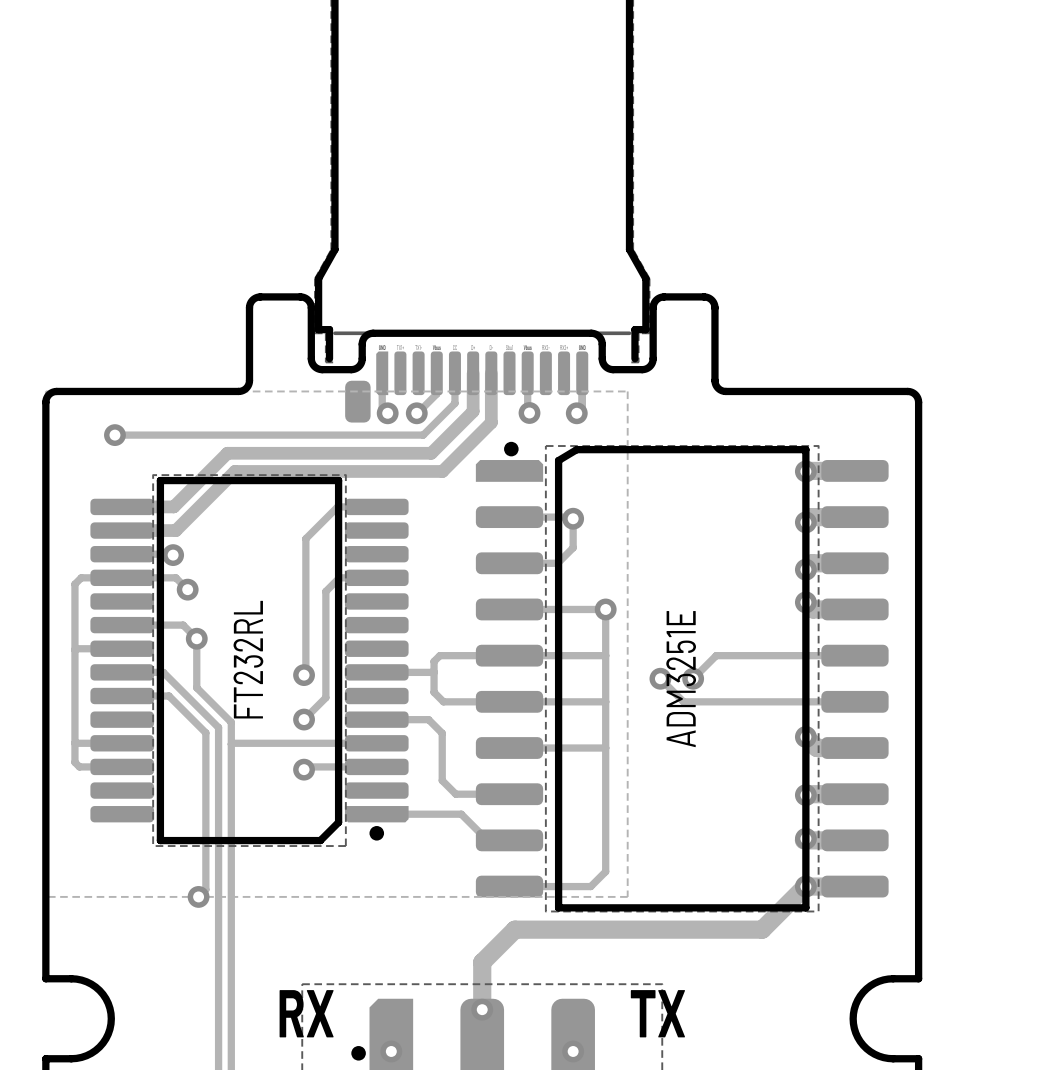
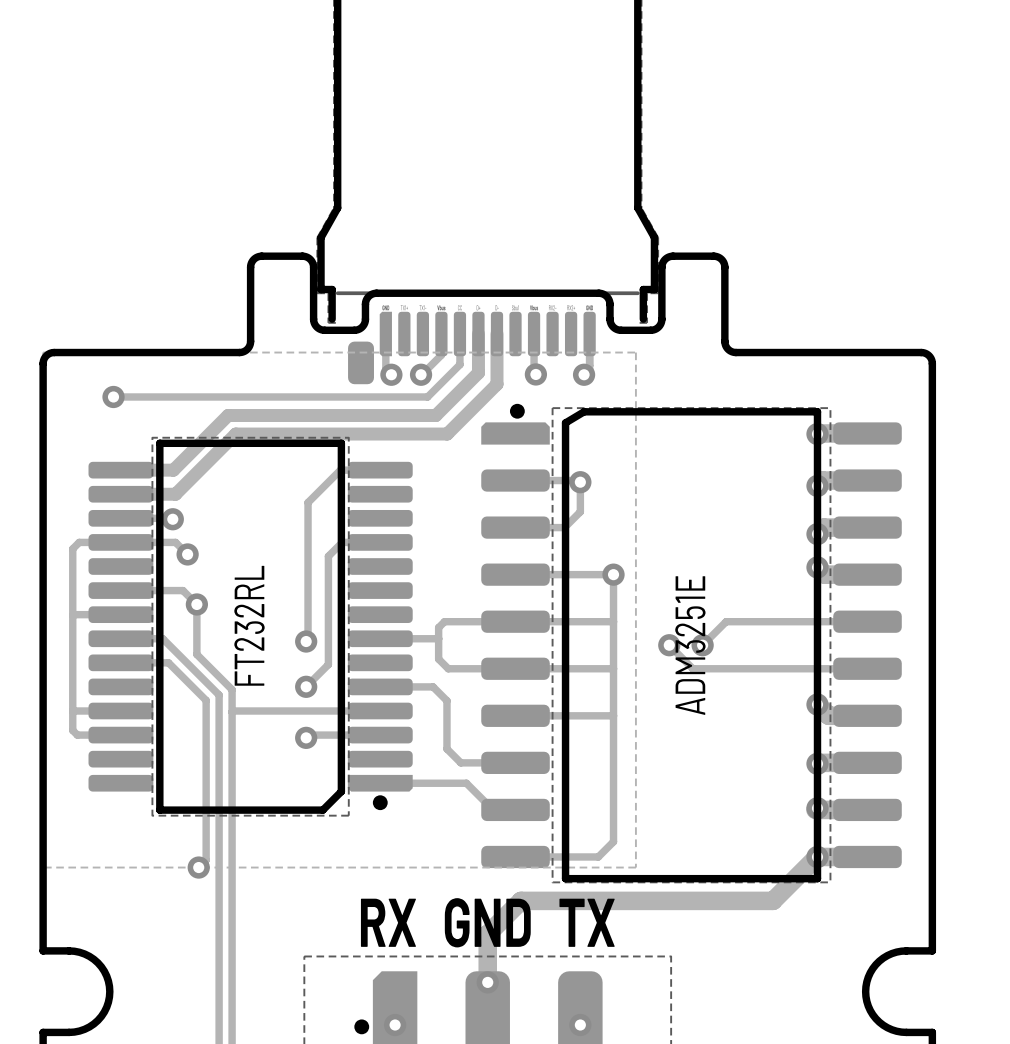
text: none -> GND (487, 922)
text position: RX (306, 1013) -> RX (388, 922)
text position: TX (657, 1013) -> TX (587, 922)

